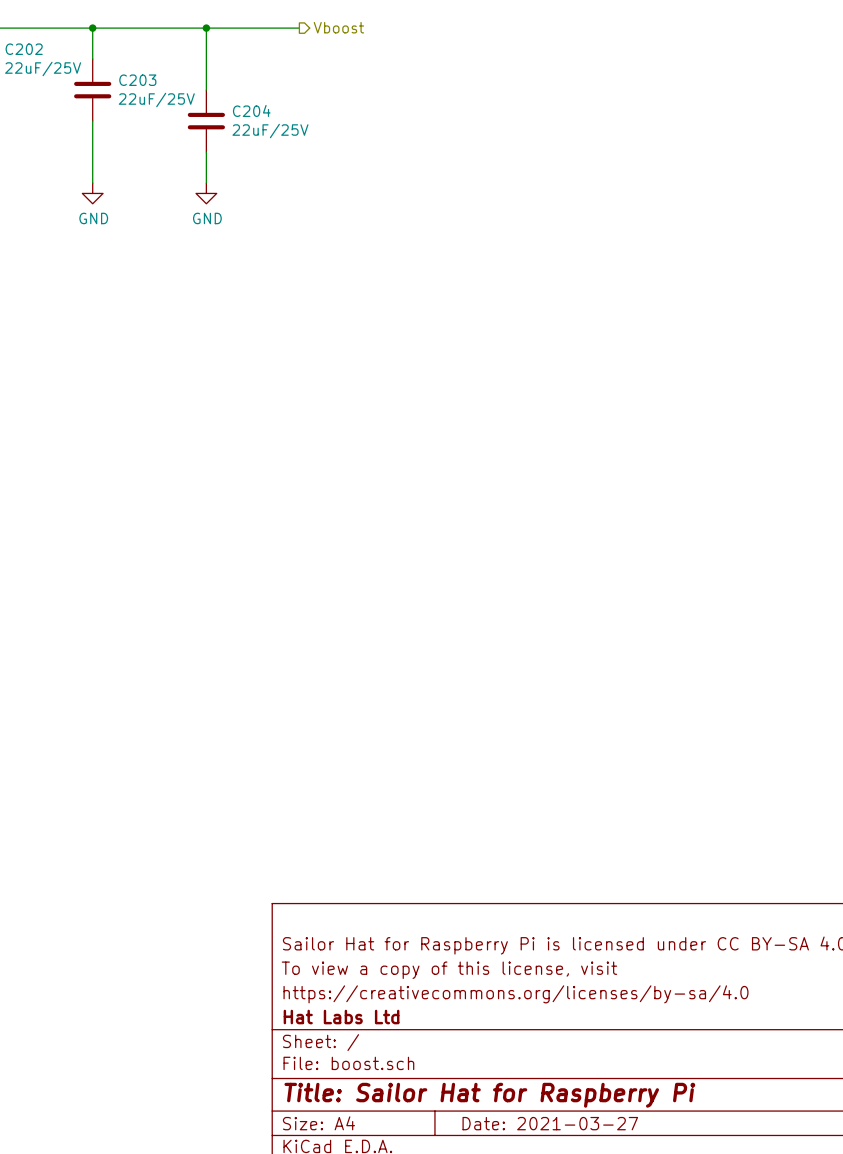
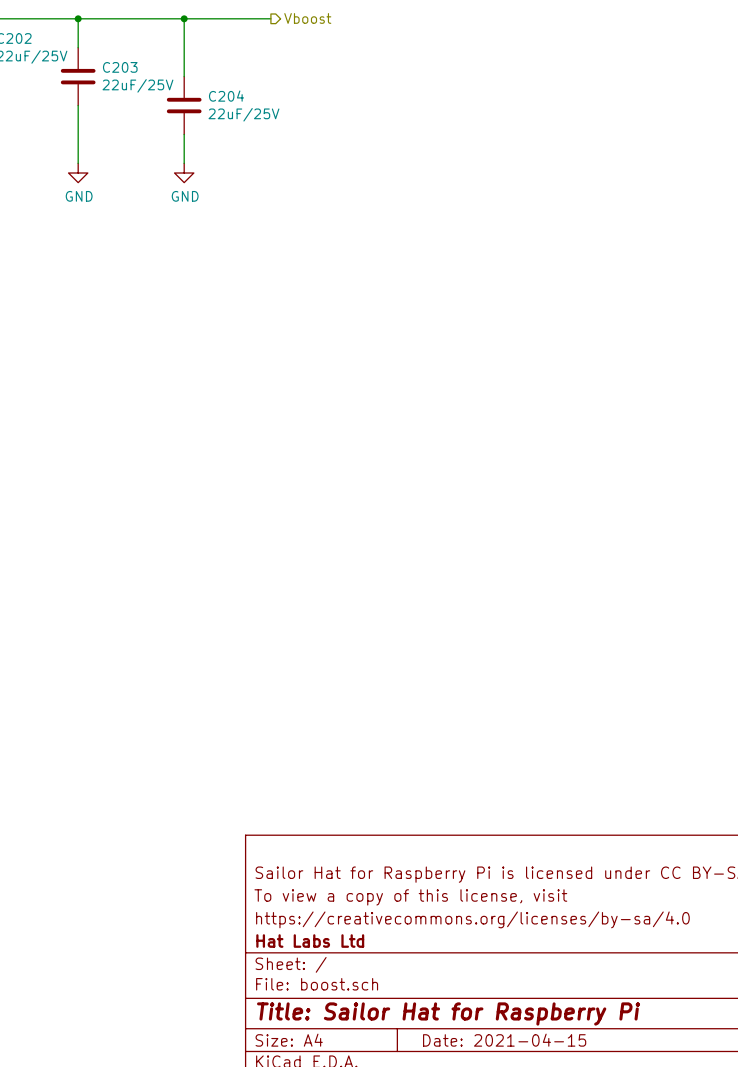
title block: Date: 2021-03-27 (550, 1123) -> Date: 2021-04-15 (504, 1040)

